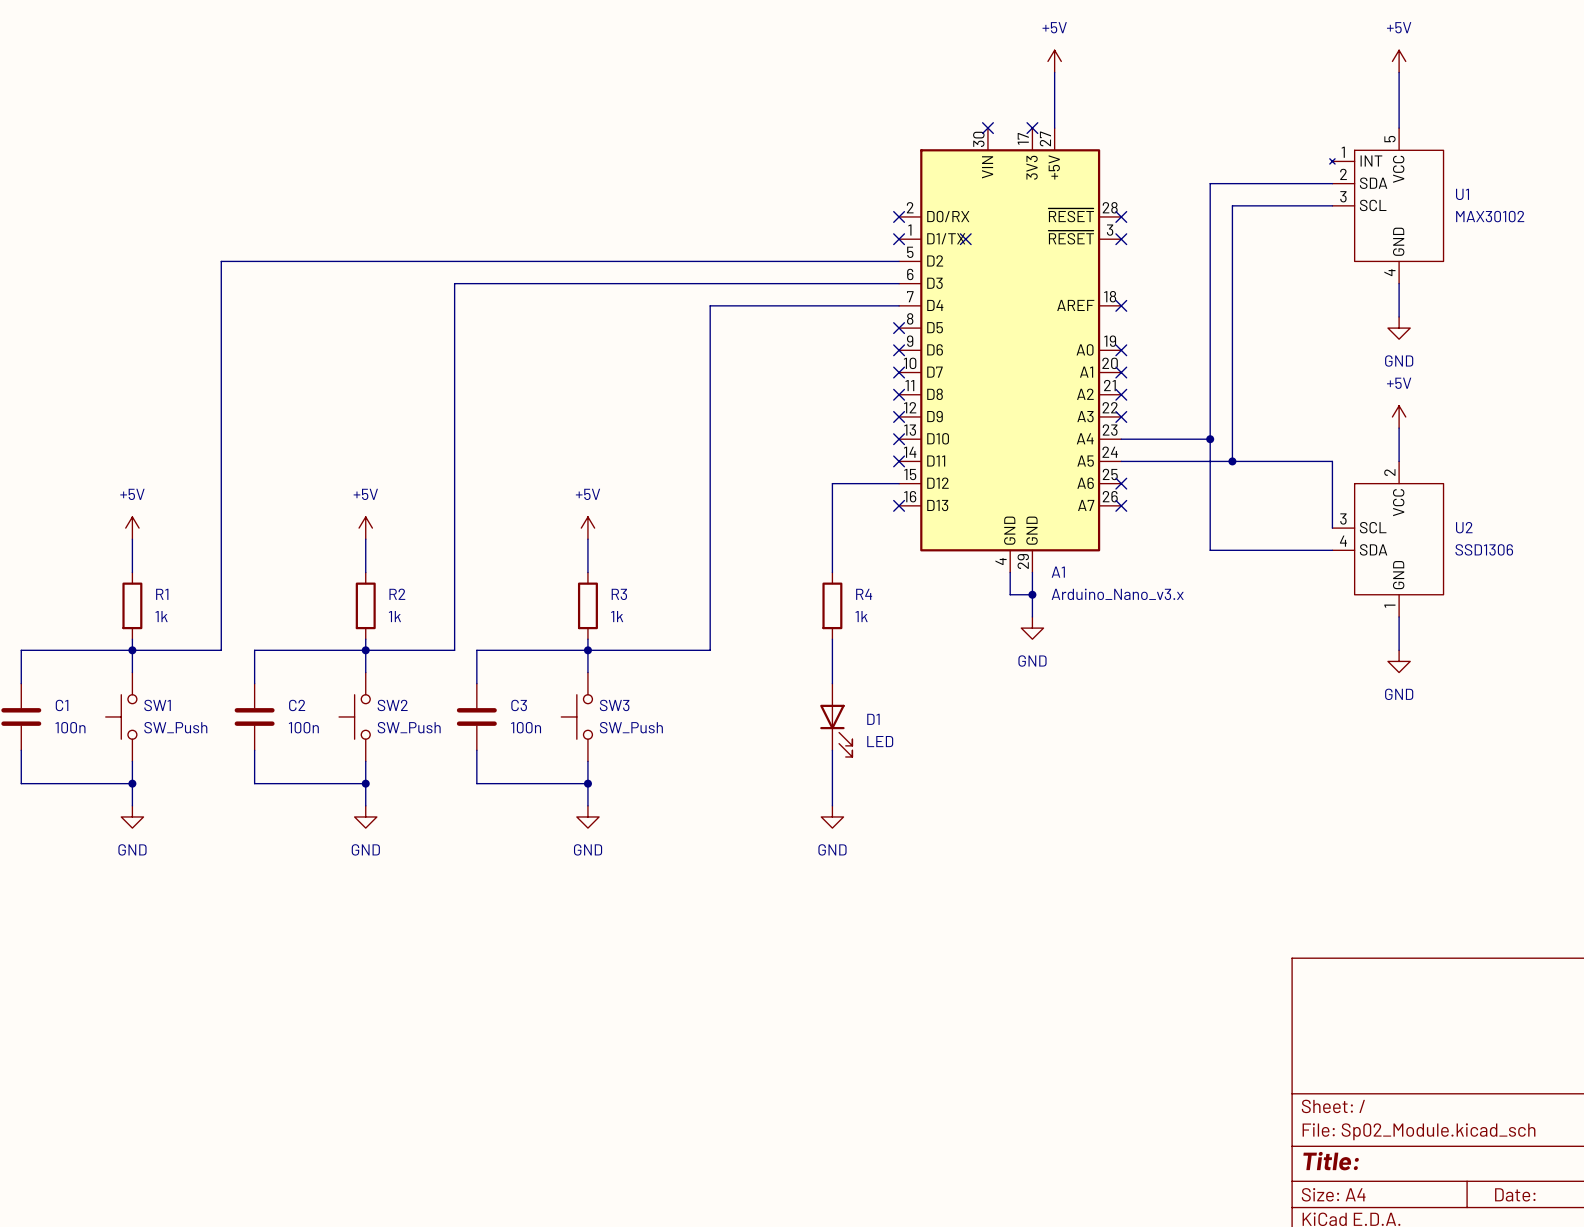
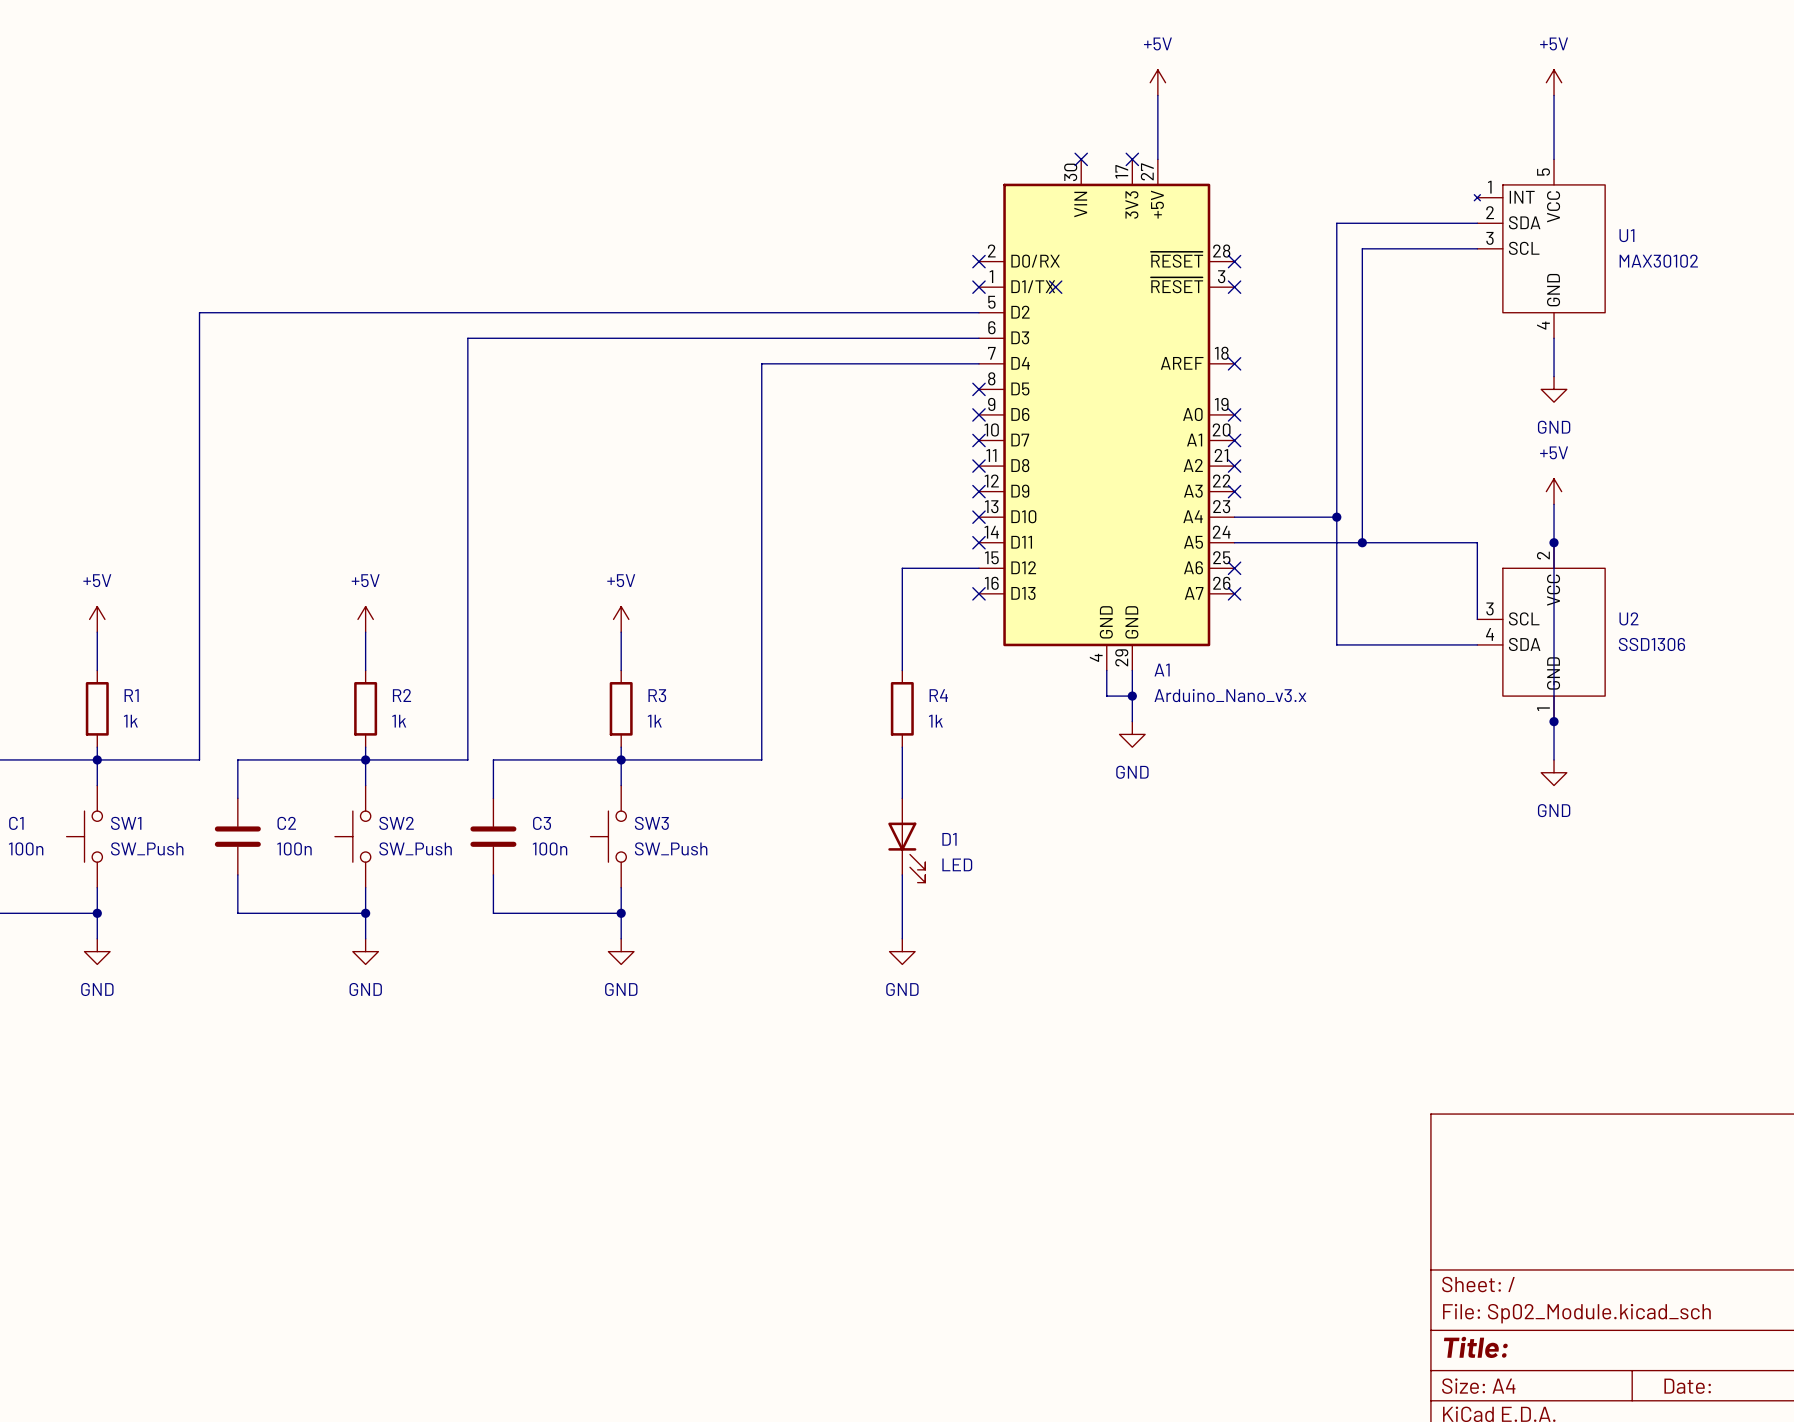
wire: none -> (1554, 542) (1554, 721)
junction: none -> (1554, 542)
junction: none -> (1554, 721)

